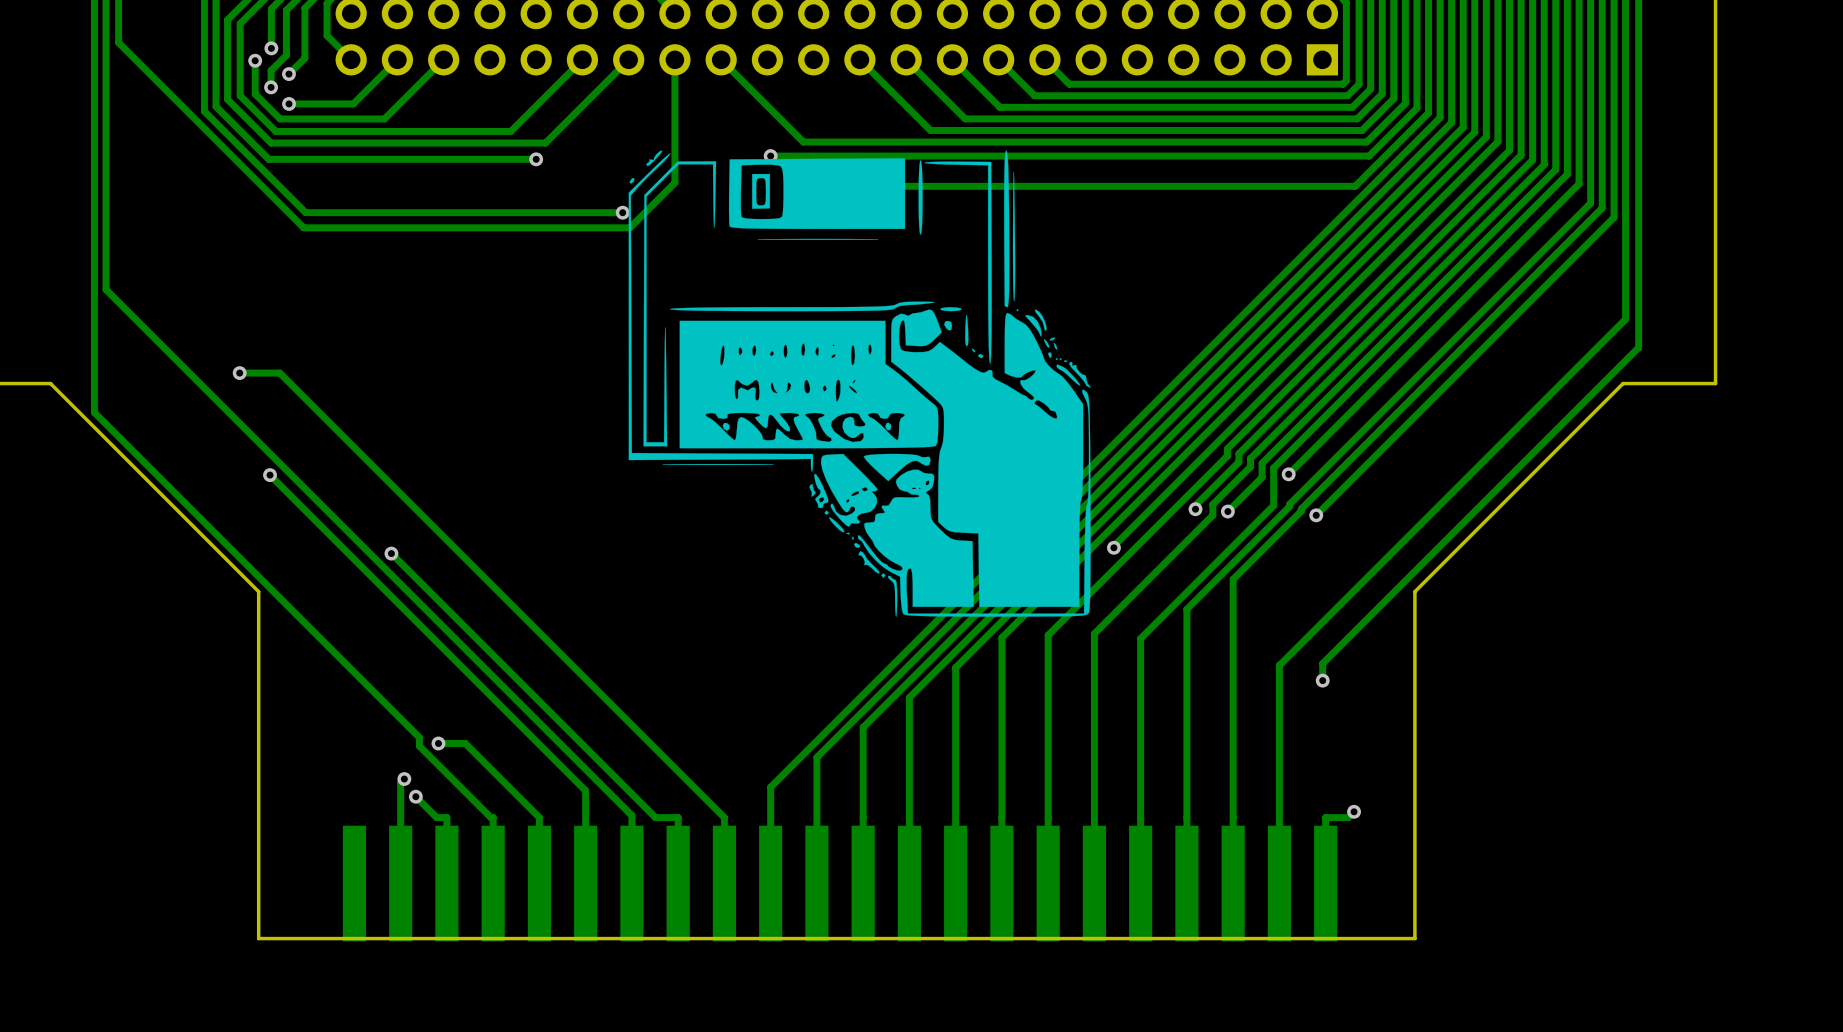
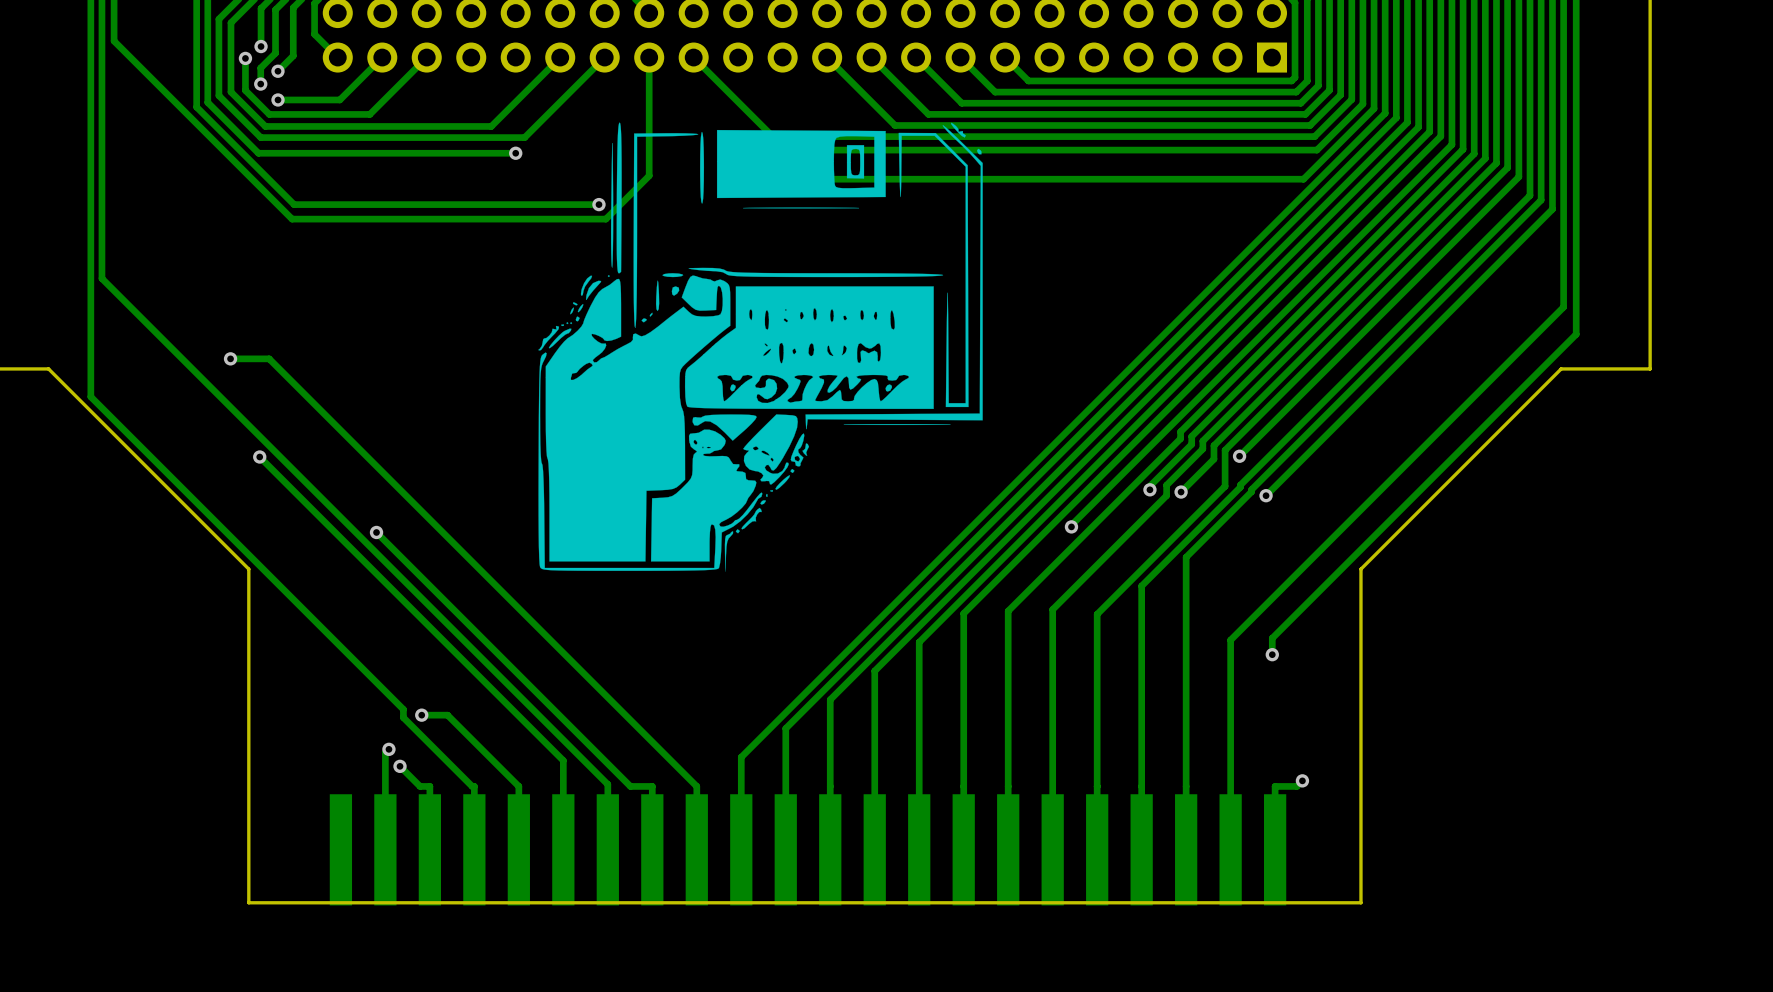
drawing: none -> [538, 122, 983, 572]
drawing: [628, 150, 1091, 617] -> none

